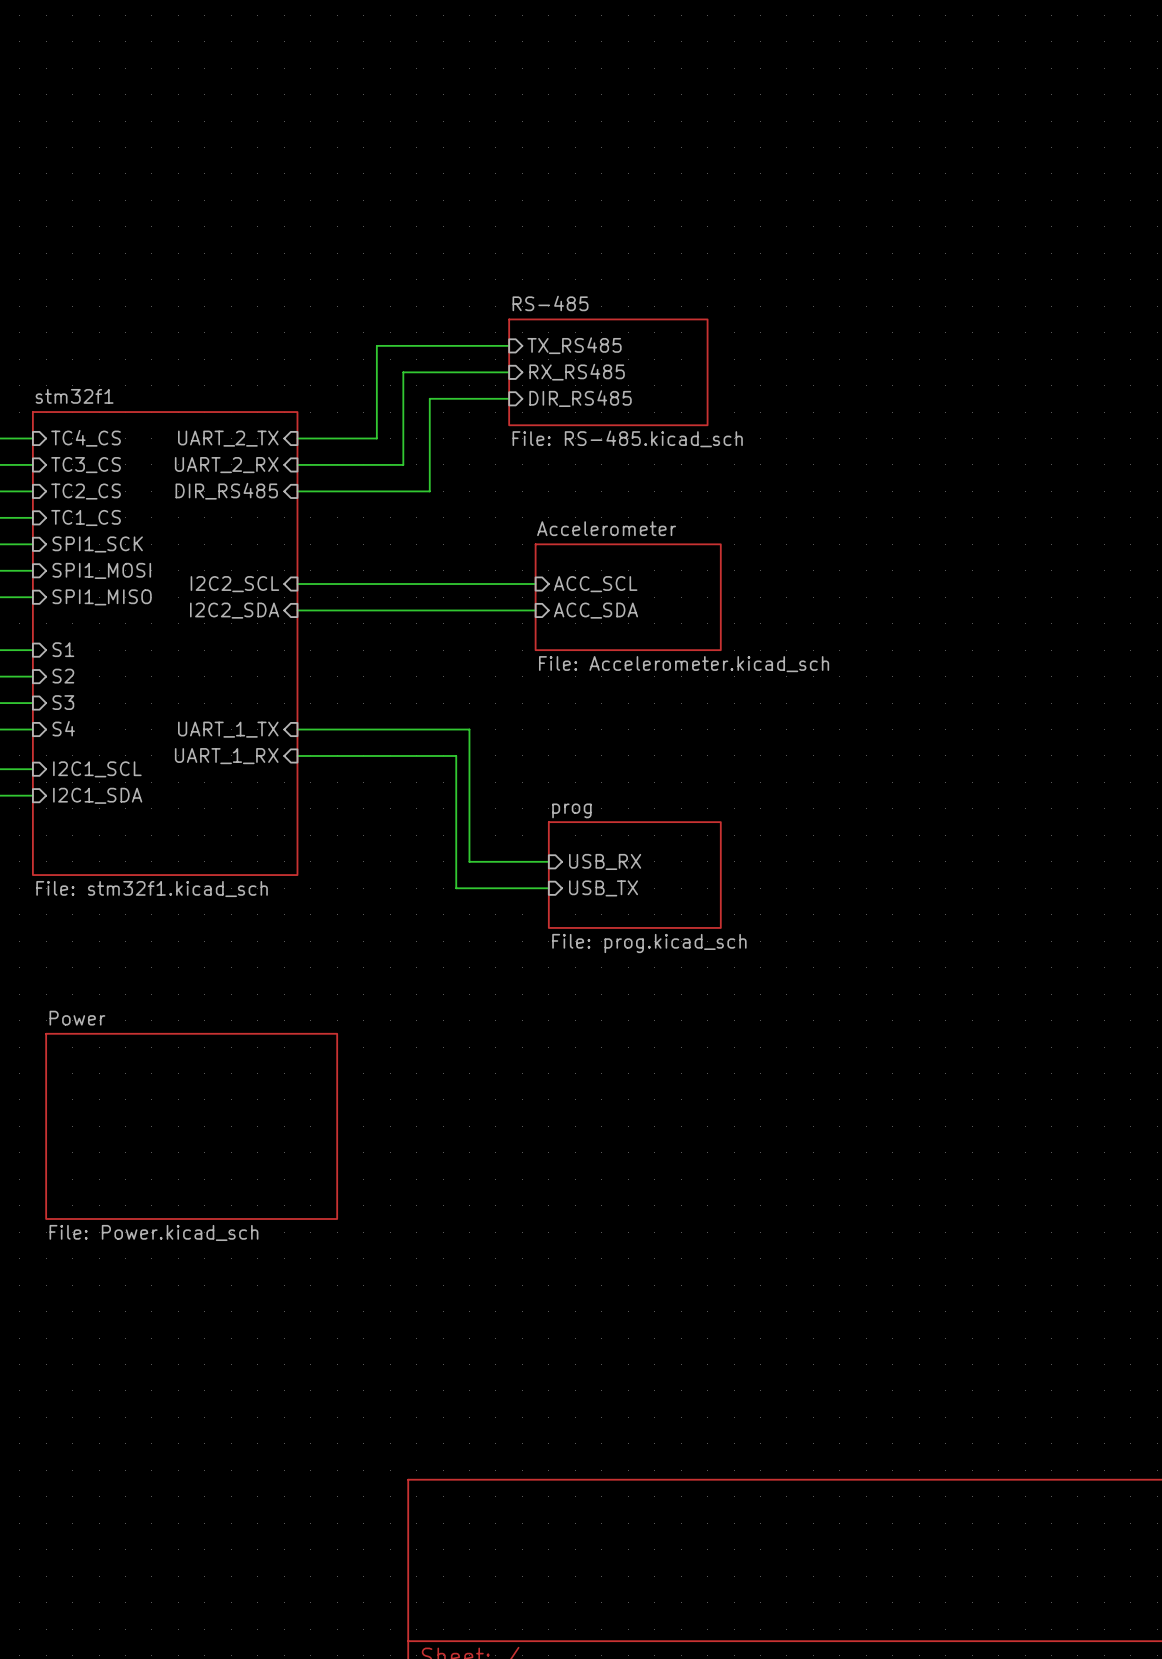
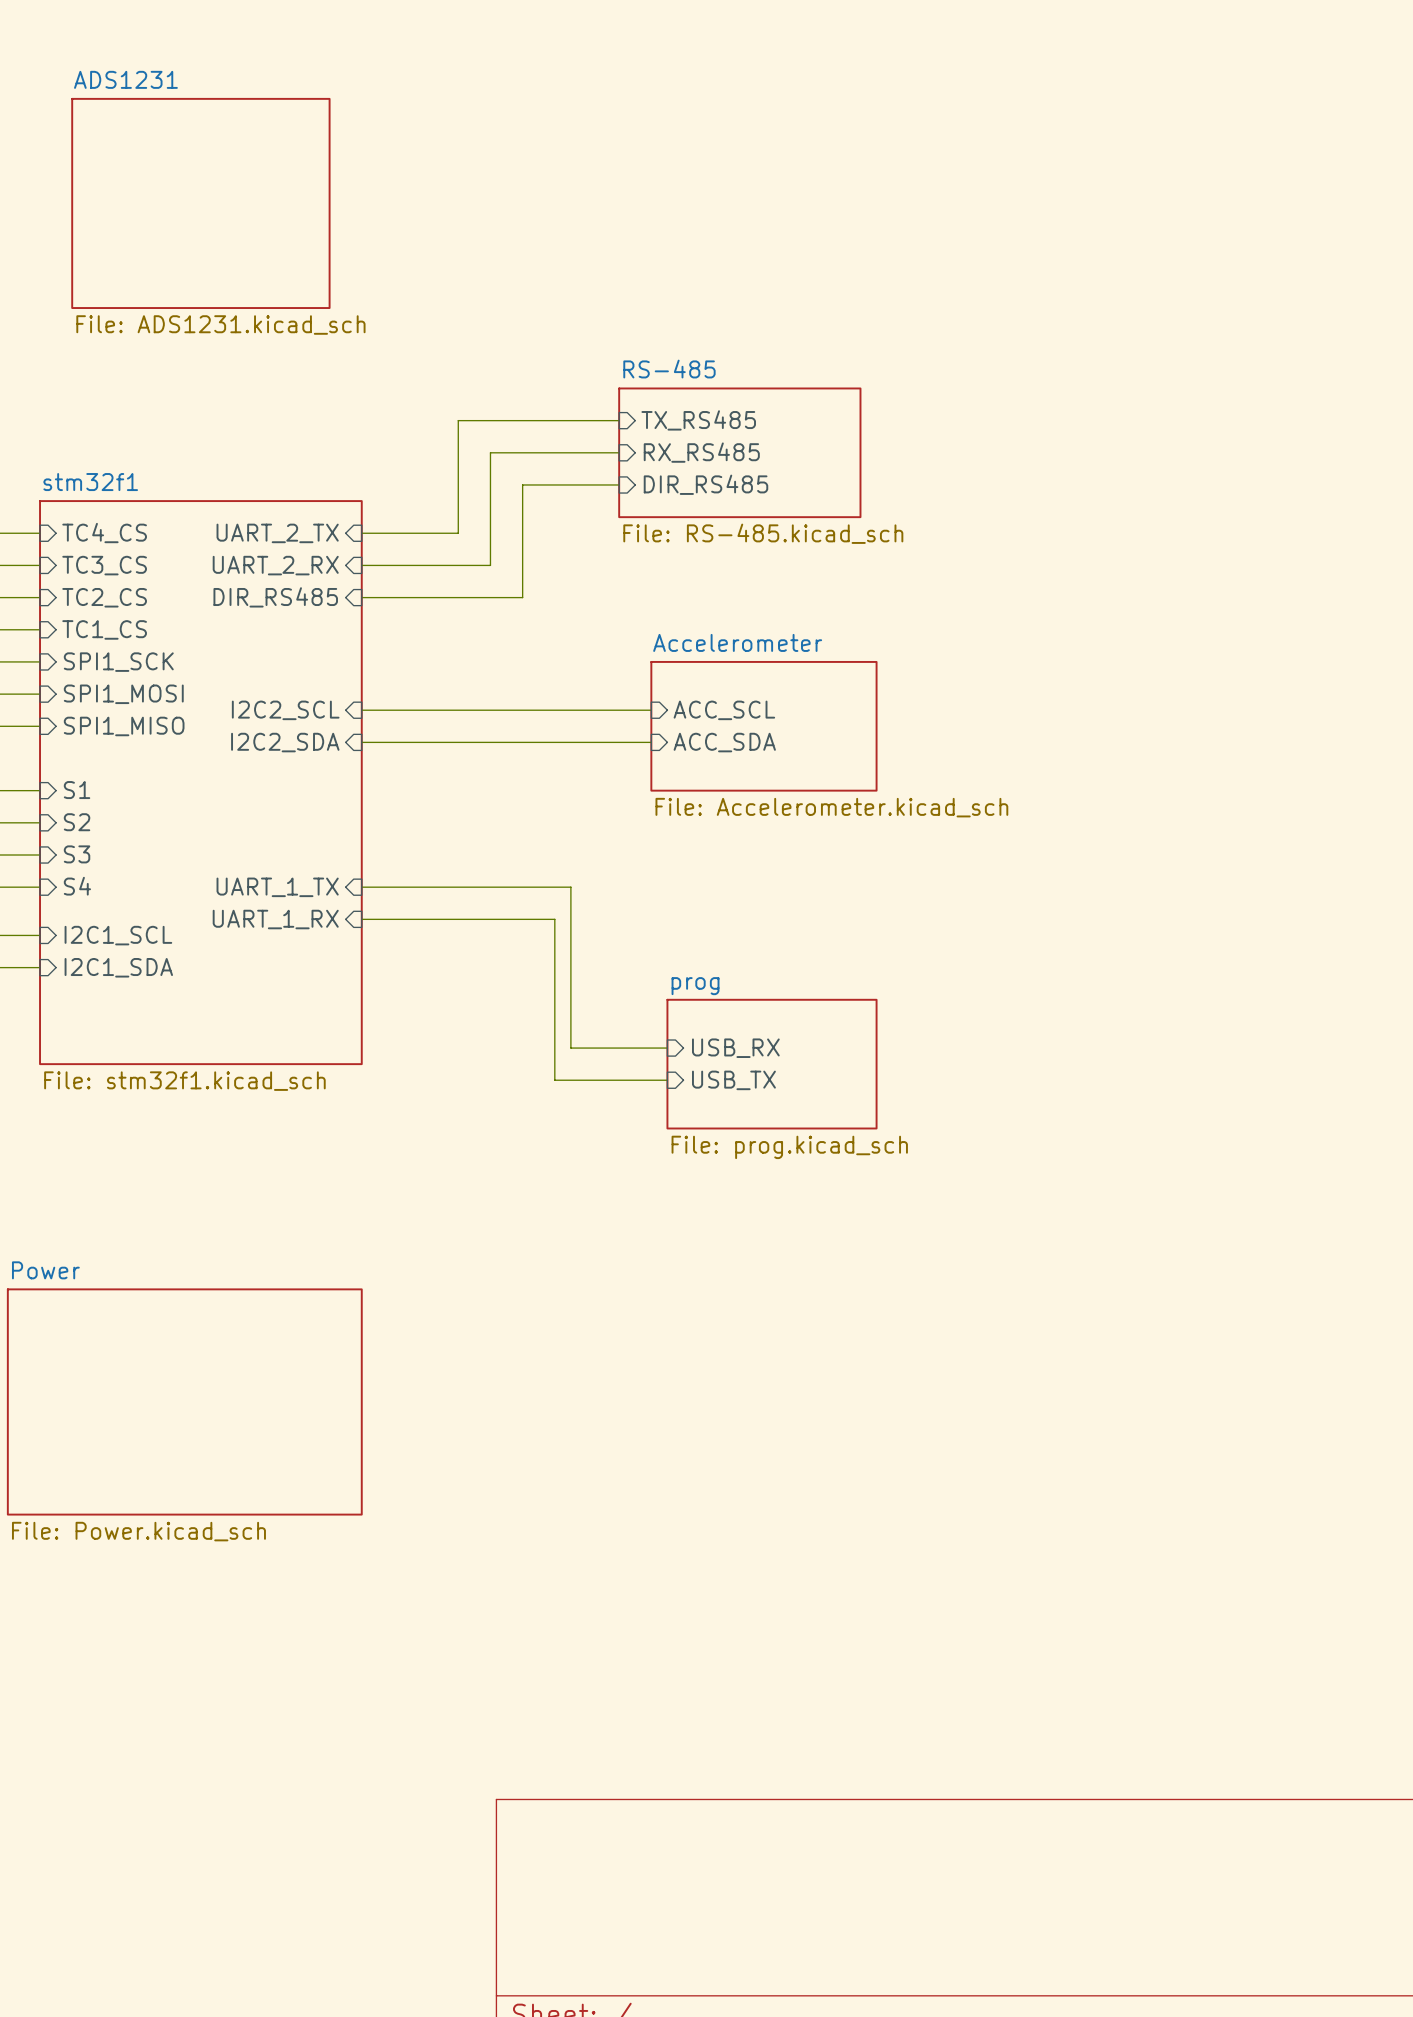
sheet ADS1231: none -> File: ADS1231.kicad_sch (200, 203)
sheet Power position: (191, 1126) -> (184, 1401)

